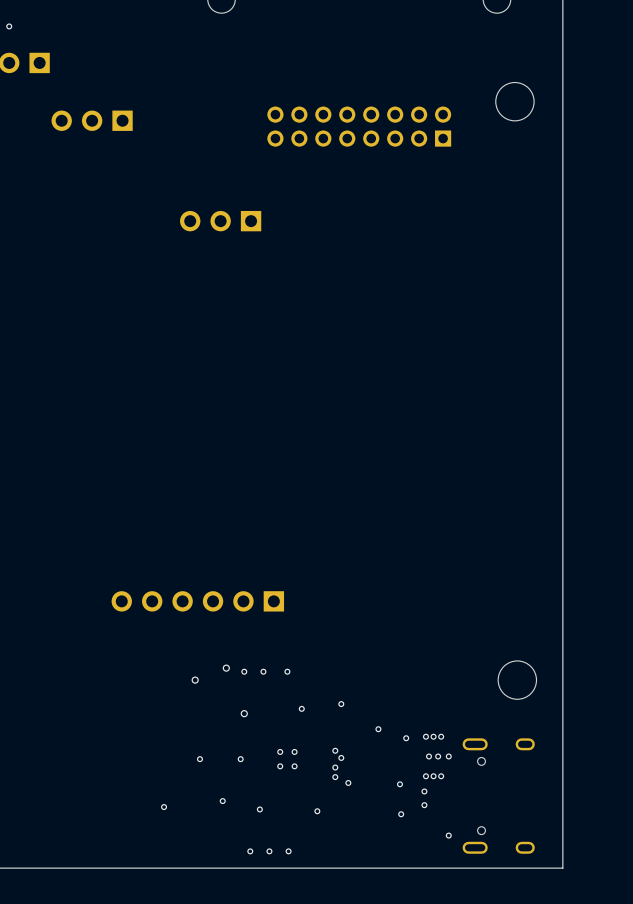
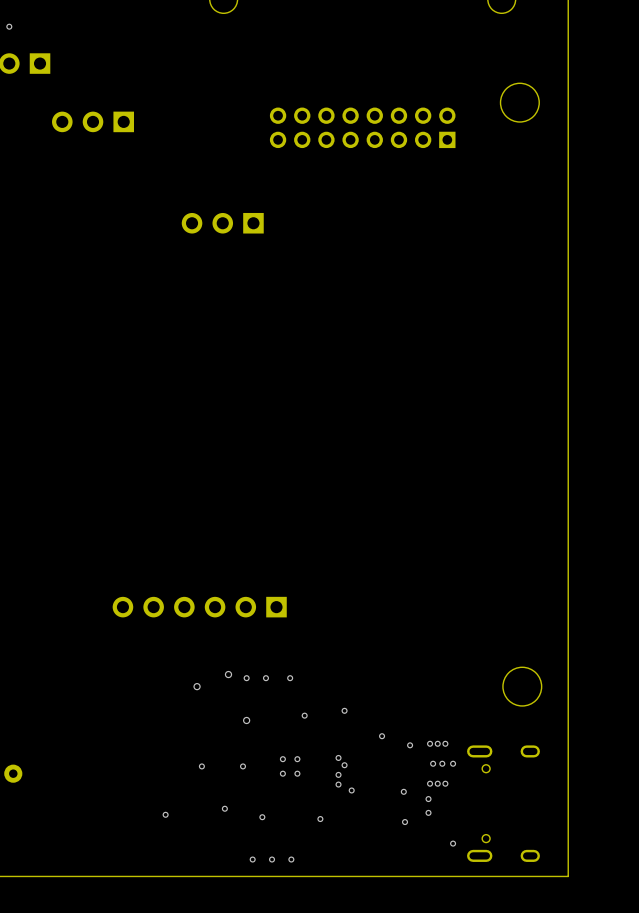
part: none -> (13, 773)

